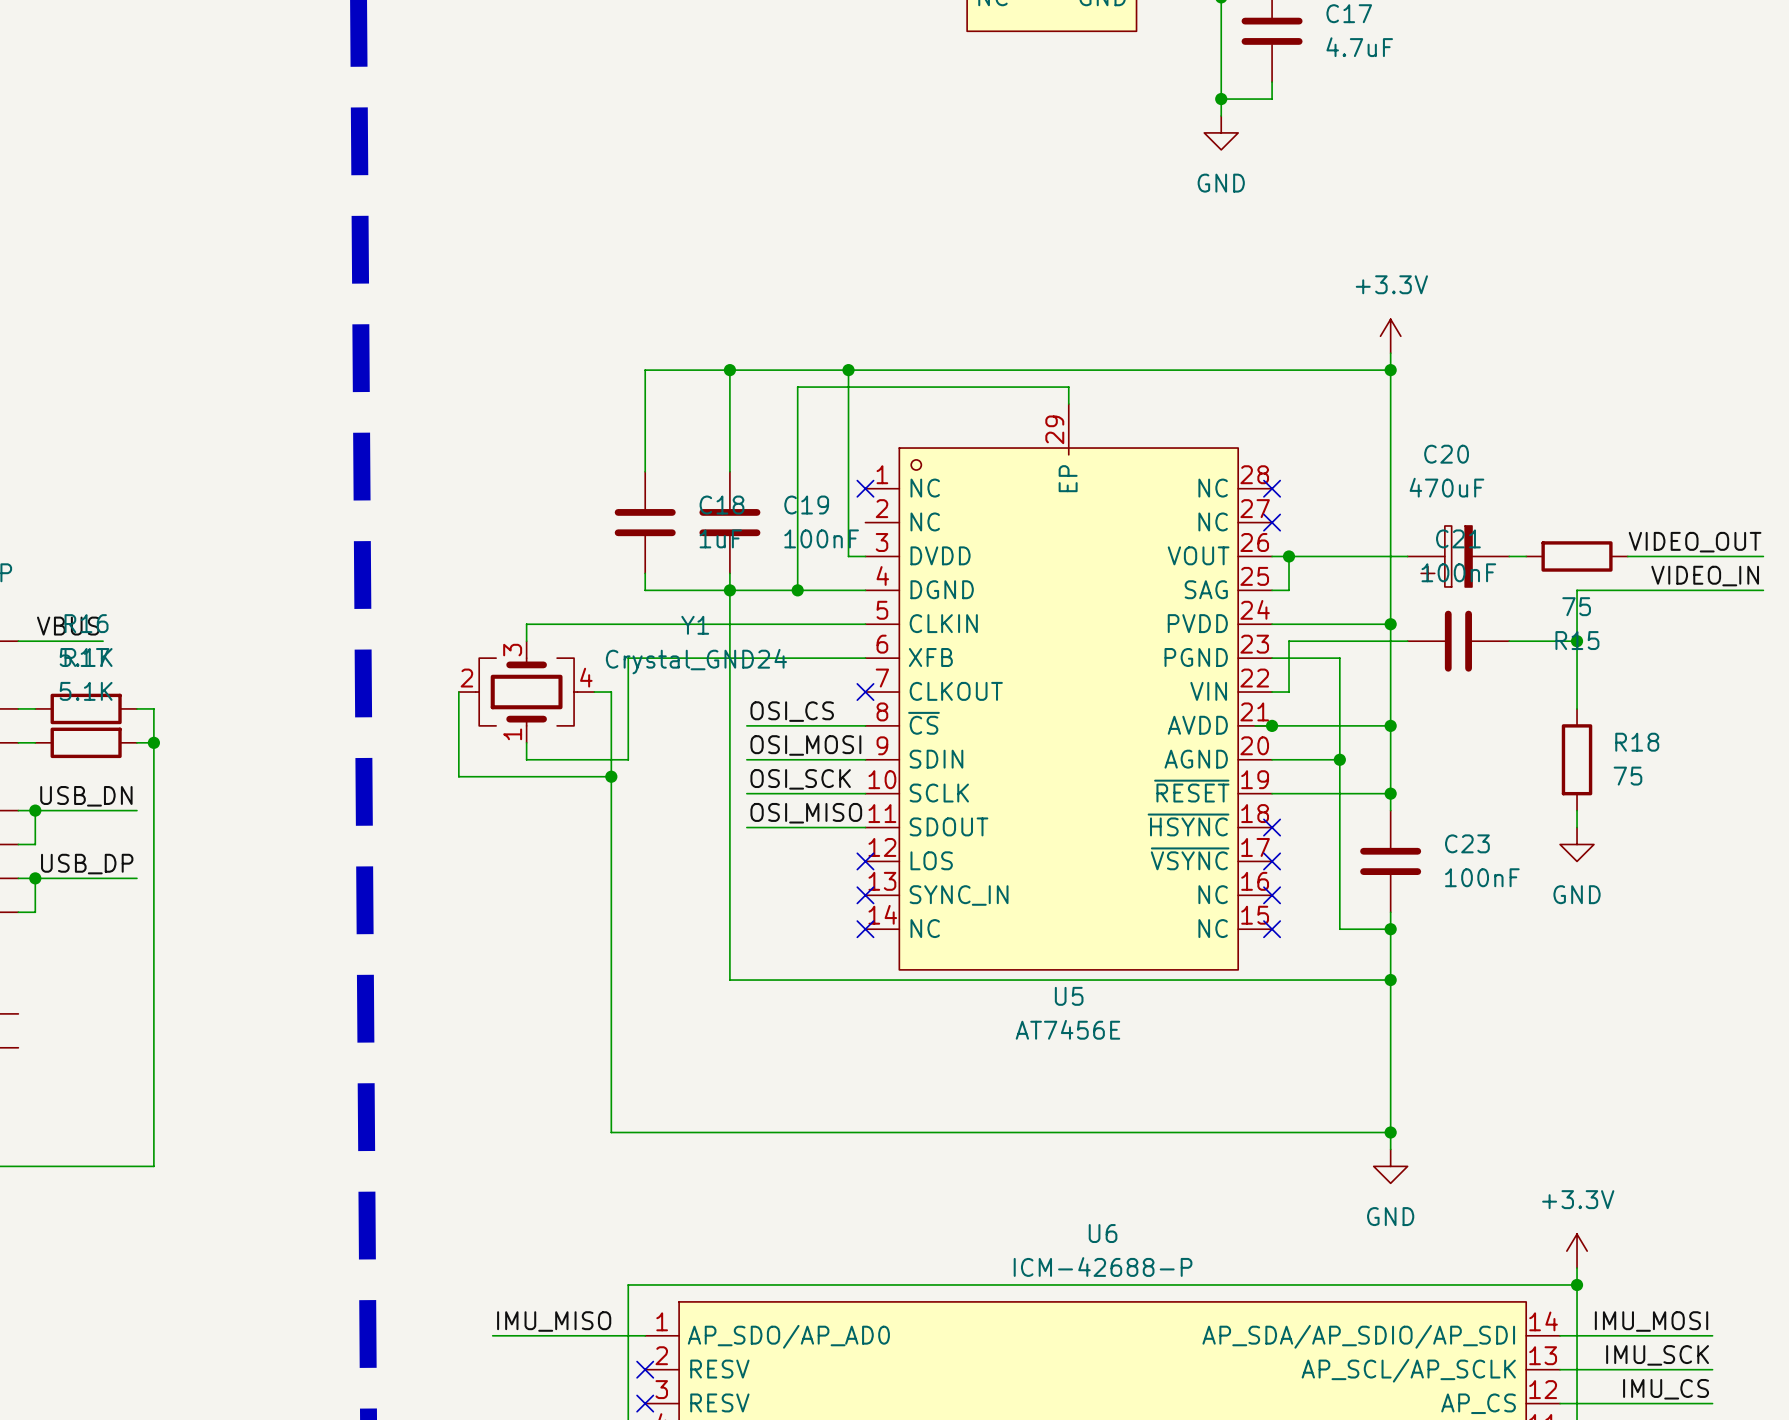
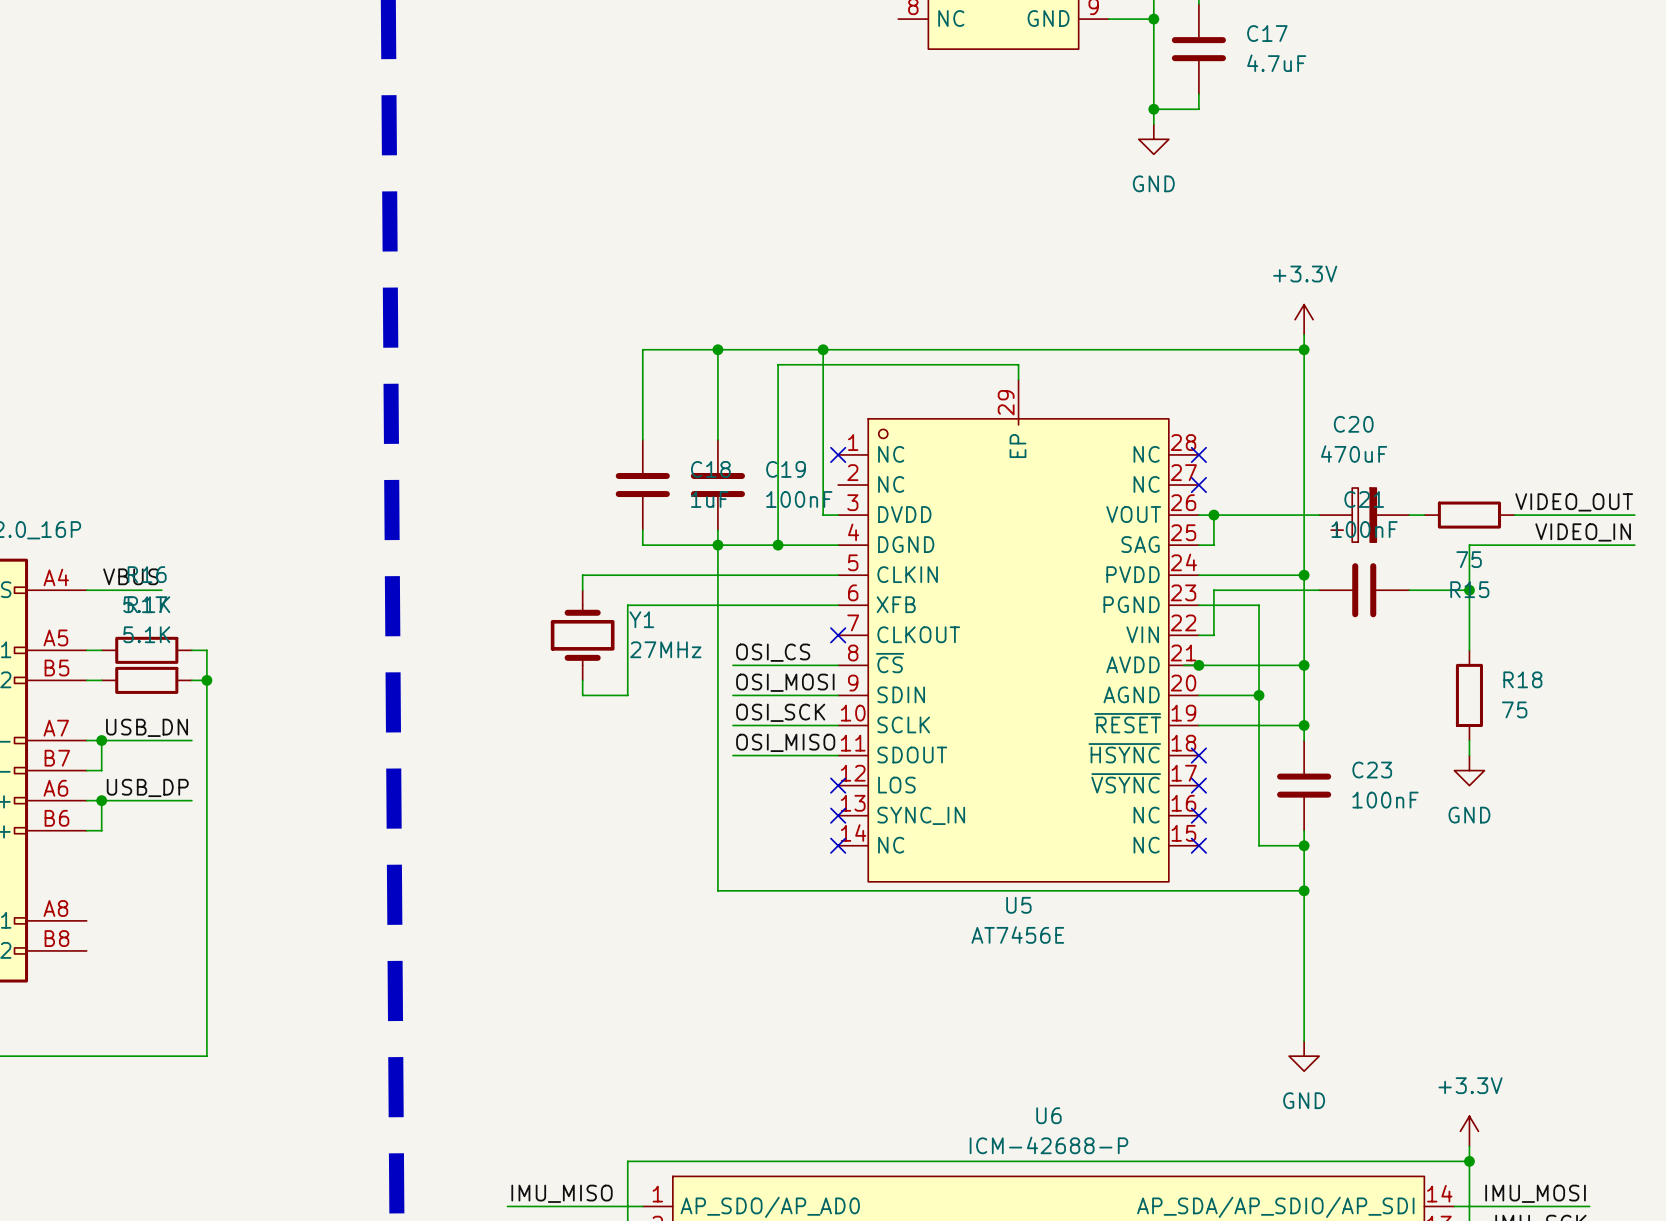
wire: (577, 624) (526, 624) (526, 641) -> (582, 575) (582, 590)
Y1 name position: Y1 (695, 625) -> Y1 (641, 619)
Y1 symbol: [458, 641, 595, 743] -> [550, 590, 615, 681]
Y1 value: Crystal_GND24 (696, 661) -> 27MHz (665, 649)
wire: (458, 692) (458, 776) (611, 776) -> none
wire: (594, 692) (611, 692) (611, 1132) (1390, 1132) -> none
wire: (526, 742) (526, 759) (577, 759) -> (582, 680) (582, 695)
junction: (611, 776) -> none
junction: (1390, 1132) -> none

